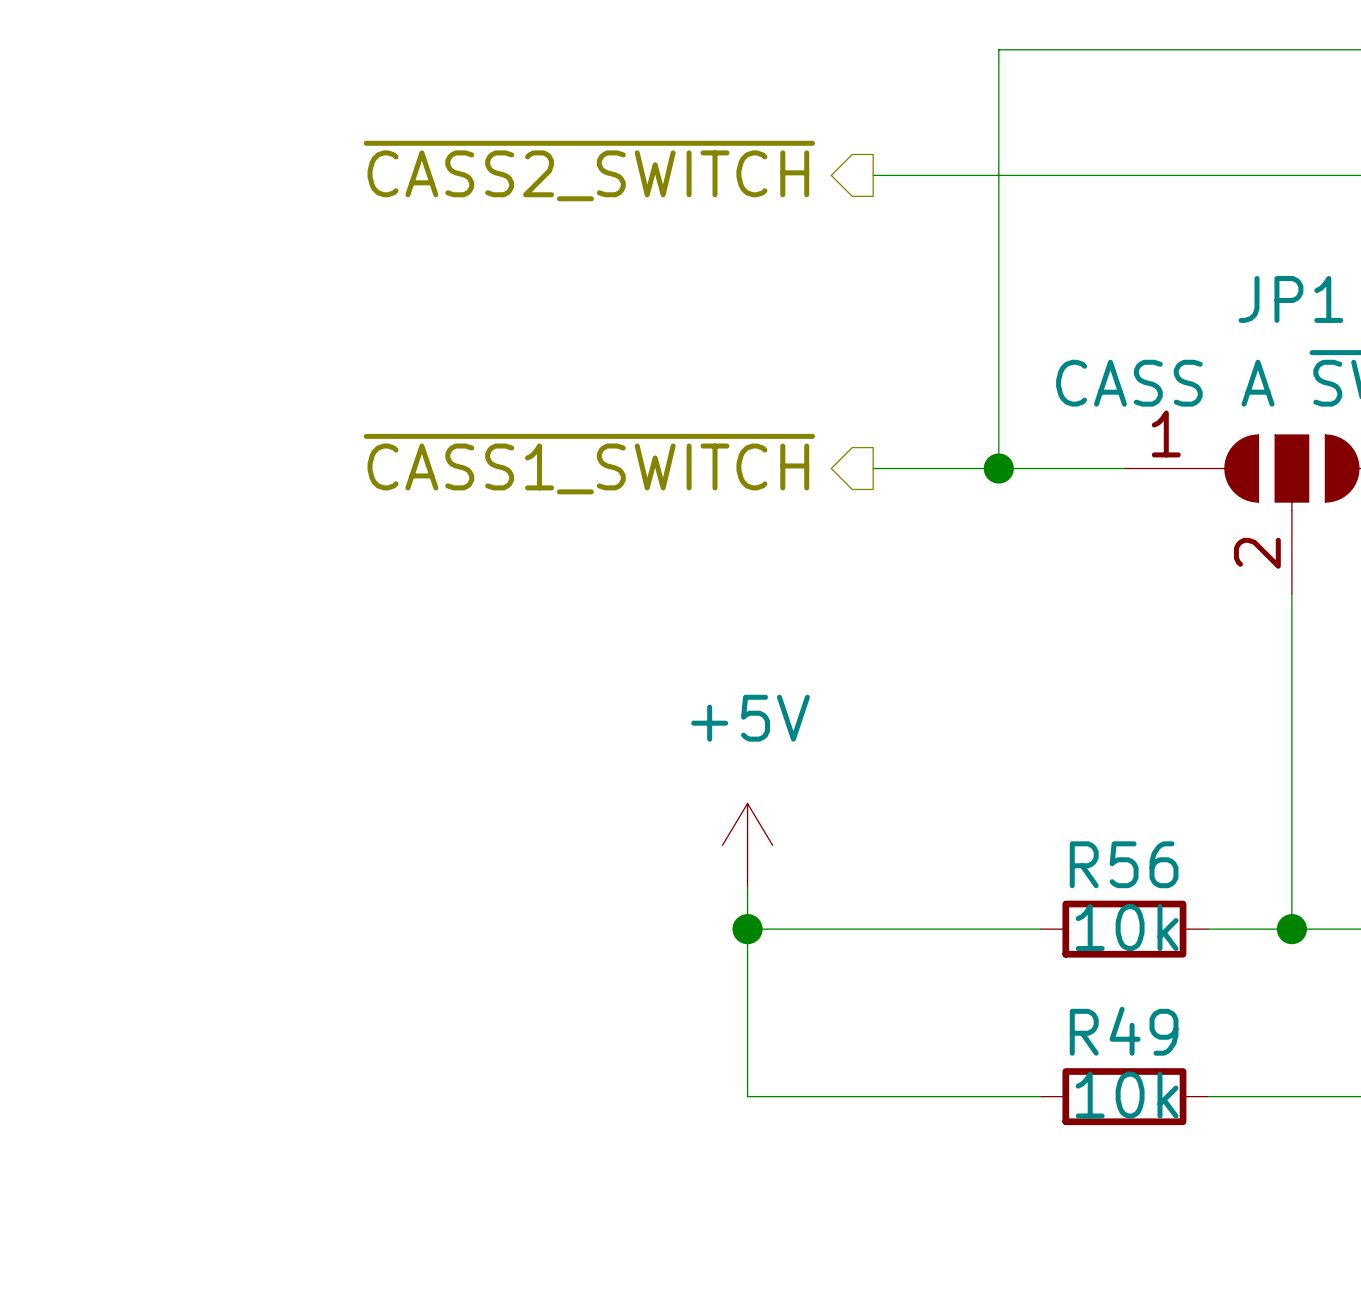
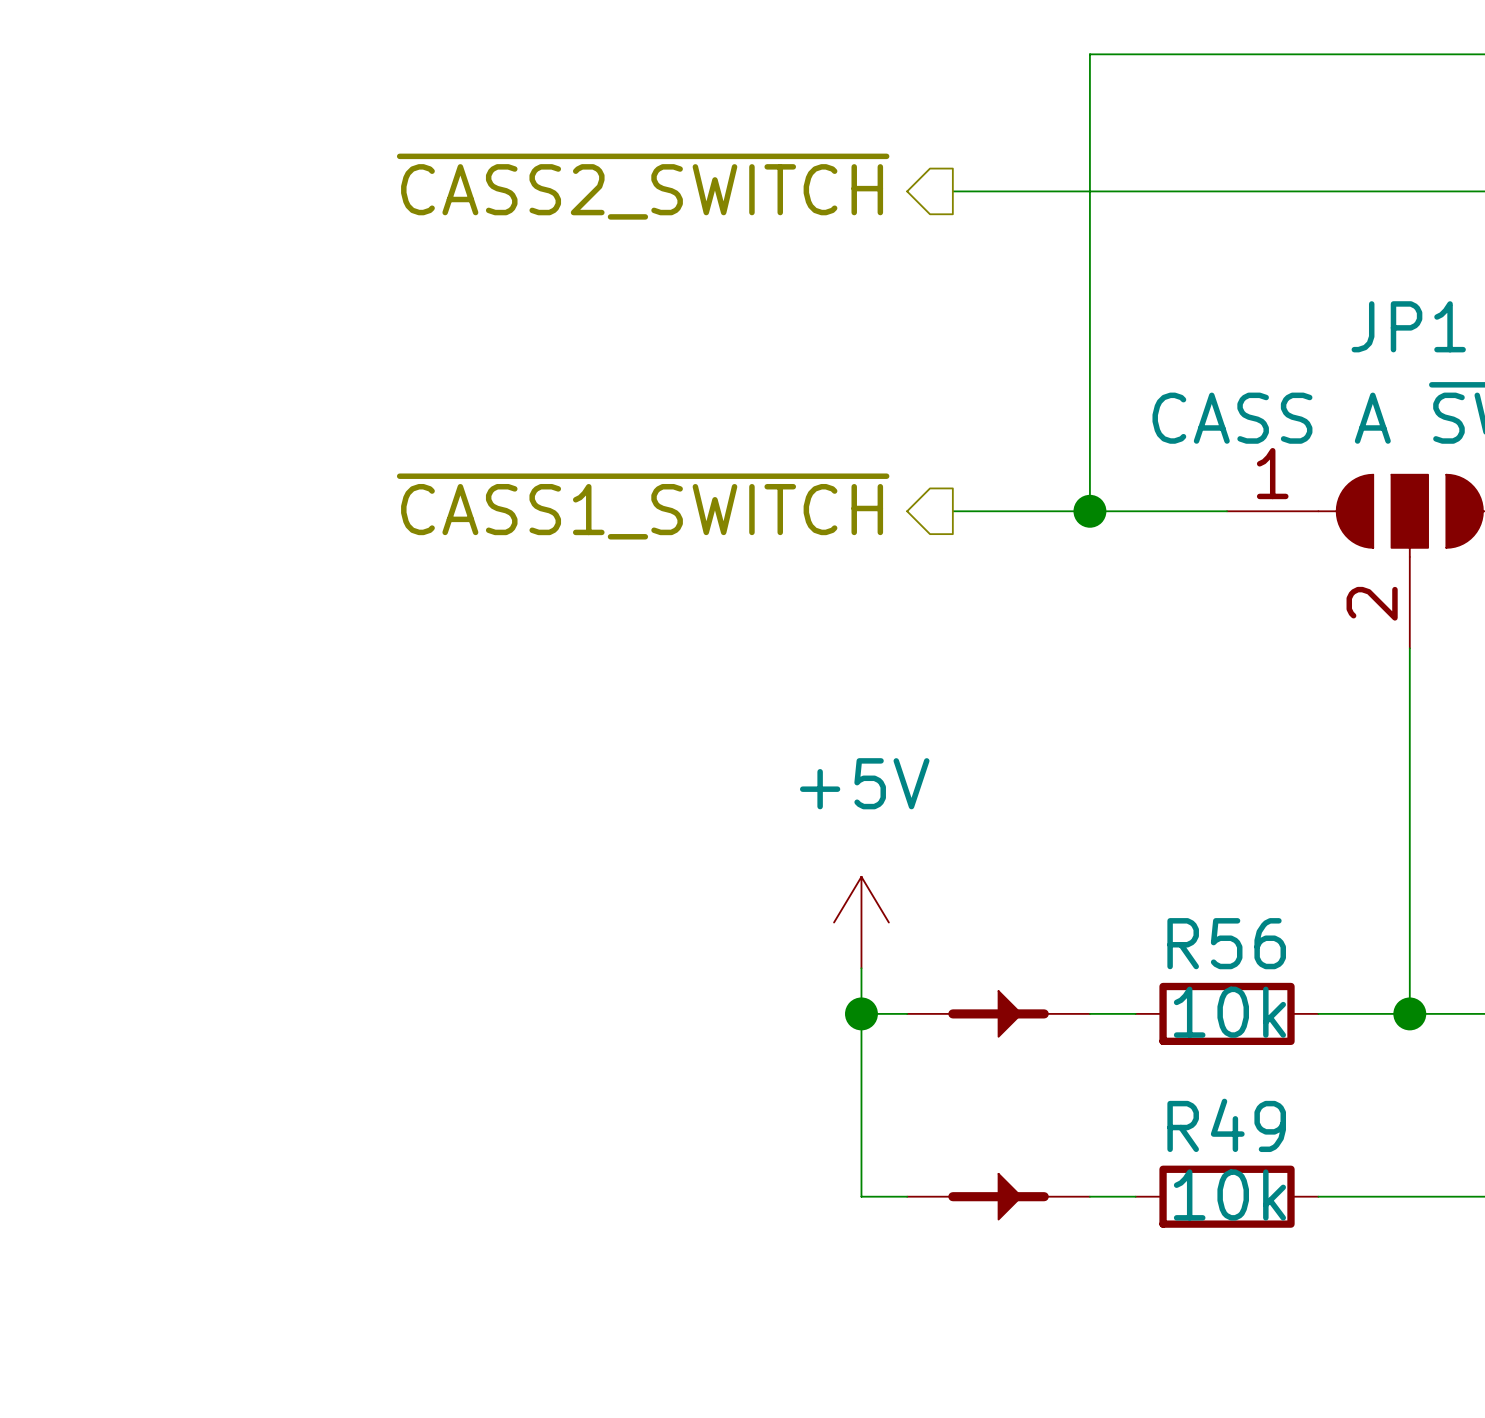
power symbol position: +5V (747, 845) -> +5V (861, 922)
wire: (747, 887) (747, 1096) (789, 1096) -> (861, 968) (861, 1196)
wire: (747, 929) (789, 929) -> none
junction position: (747, 929) -> (861, 1013)
part: none -> (998, 1013)
part: none -> (998, 1196)

